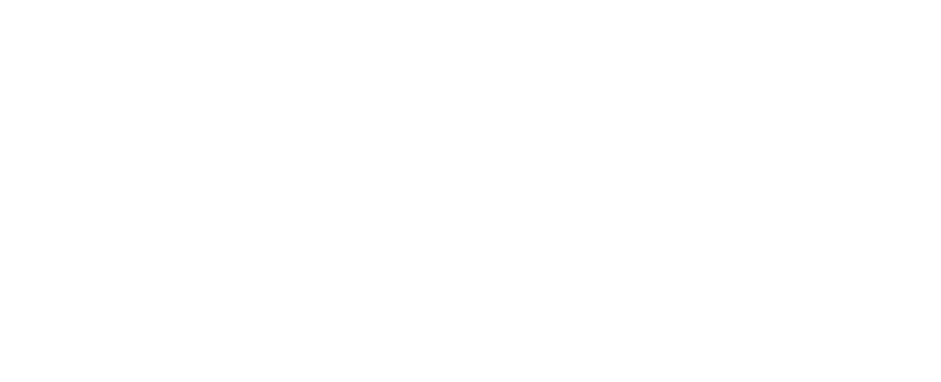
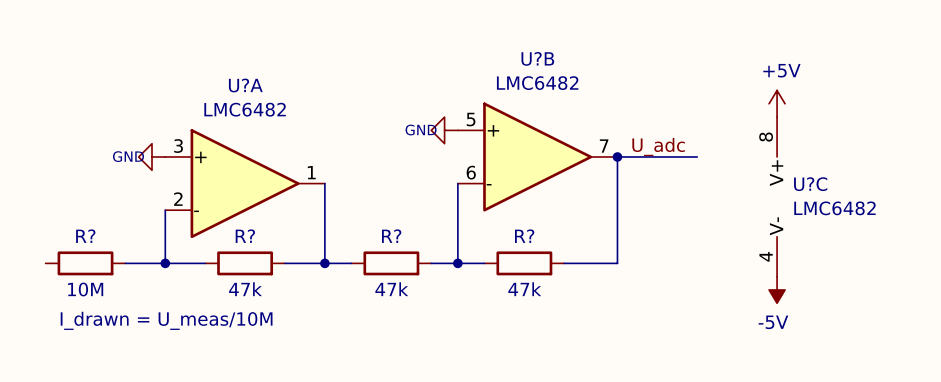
power symbol: none -> +5V (777, 103)
power symbol: none -> GND (444, 130)
label: none -> U_adc (658, 146)
power symbol: none -> GND (152, 156)
U?B: none -> LMC6482 (537, 156)
junction: none -> (617, 156)
wire: none -> (697, 156) (617, 156) (617, 263) (564, 263)
U?A: none -> LMC6482 (245, 183)
wire: none -> (324, 183) (324, 263)
wire: none -> (457, 183) (457, 263)
U?C: none -> LMC6482 (777, 196)
wire: none -> (165, 210) (165, 263)
R?: none -> 10M (85, 263)
wire: none -> (125, 263) (205, 263)
junction: none -> (165, 263)
R?: none -> 47k (245, 263)
wire: none -> (284, 263) (351, 263)
junction: none -> (324, 263)
R?: none -> 47k (391, 263)
wire: none -> (431, 263) (484, 263)
junction: none -> (457, 263)
R?: none -> 47k (524, 263)
power symbol: none -> -5V (777, 289)
text: none -> I_drawn = U_meas/10M (166, 320)

